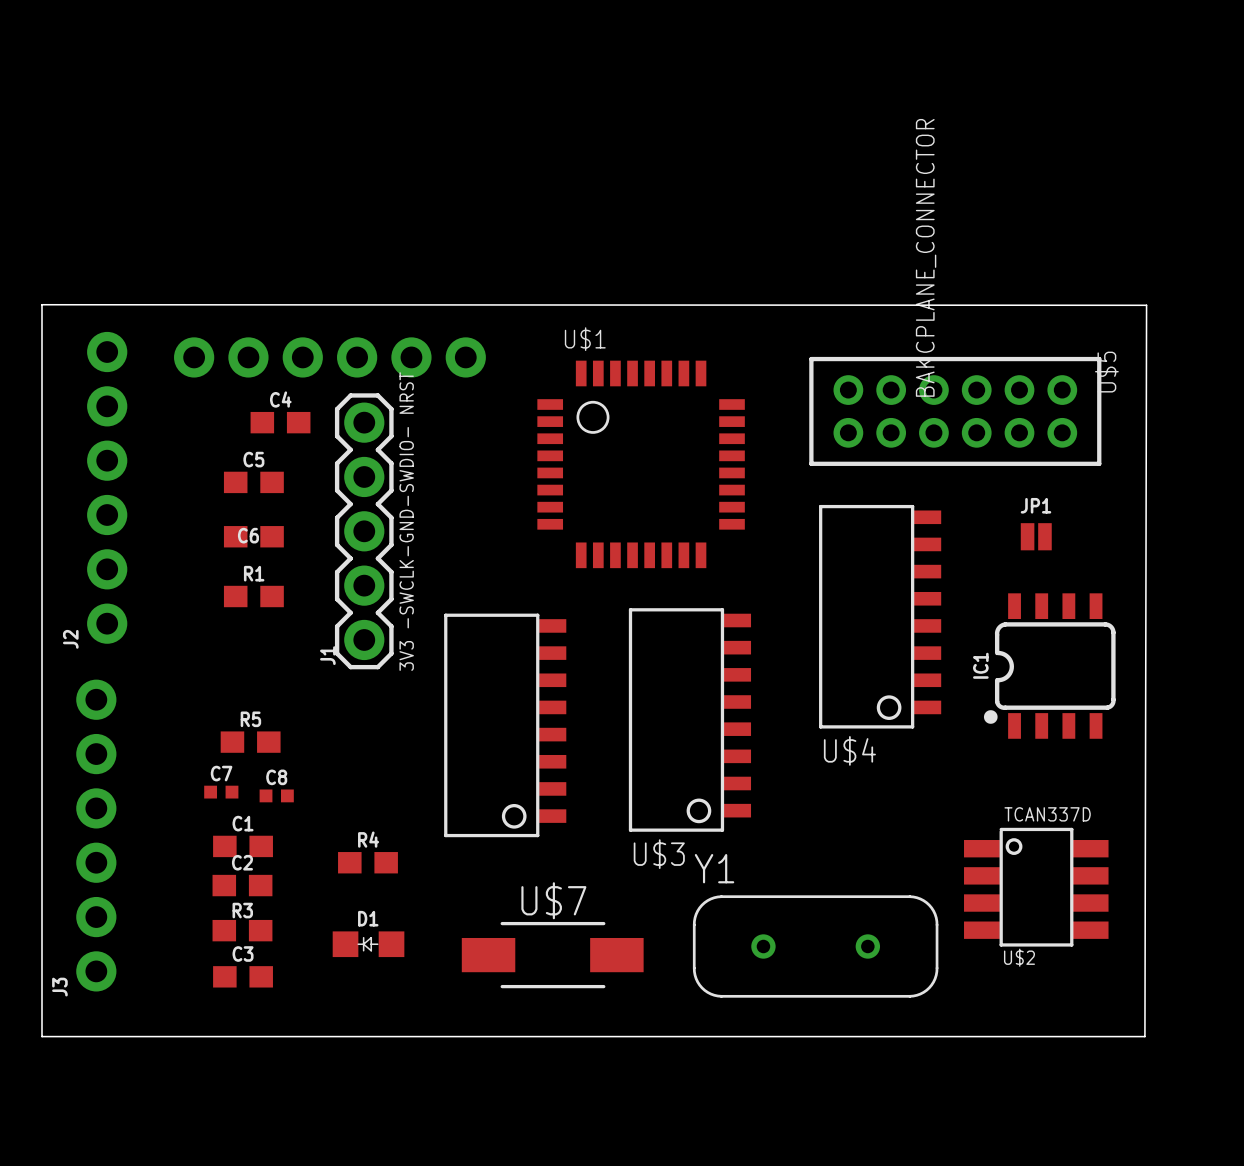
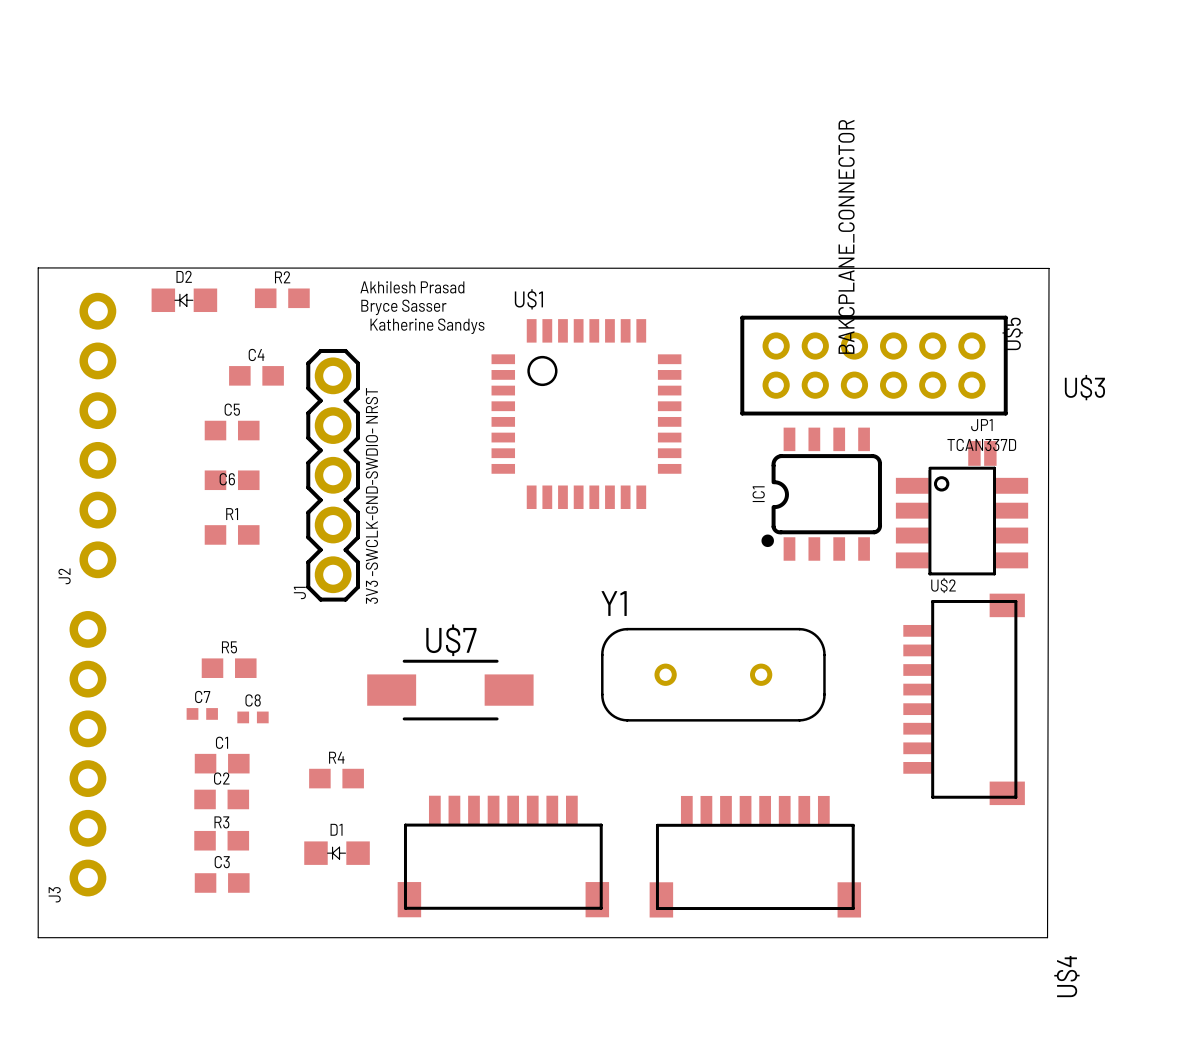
text: none -> Akhilesh Prasad (412, 287)
R2: none -> (282, 298)
D2: none -> (184, 300)
text: none -> Bryce Sasser (403, 307)
part: (329, 357) -> none
text: none -> Katherine Sandys (427, 326)
U$4 footprint: [819, 504, 942, 729] -> [649, 795, 862, 918]
JP1 position: (1036, 536) -> (982, 453)
U$3 footprint: [628, 608, 752, 832] -> [903, 593, 1025, 806]
IC1 position: (1049, 666) -> (821, 494)
part: (505, 725) -> none
U$4 name position: U$4 (849, 750) -> U$4 (1066, 976)
U$2 value position: TCAN337D (1047, 814) -> TCAN337D (981, 444)
U$3 name position: U$3 (659, 854) -> U$3 (1084, 387)
U$2 position: (1036, 887) -> (962, 521)
Y1 position: (815, 946) -> (713, 674)
part: none -> (503, 856)
U$7 position: (552, 955) -> (450, 690)

